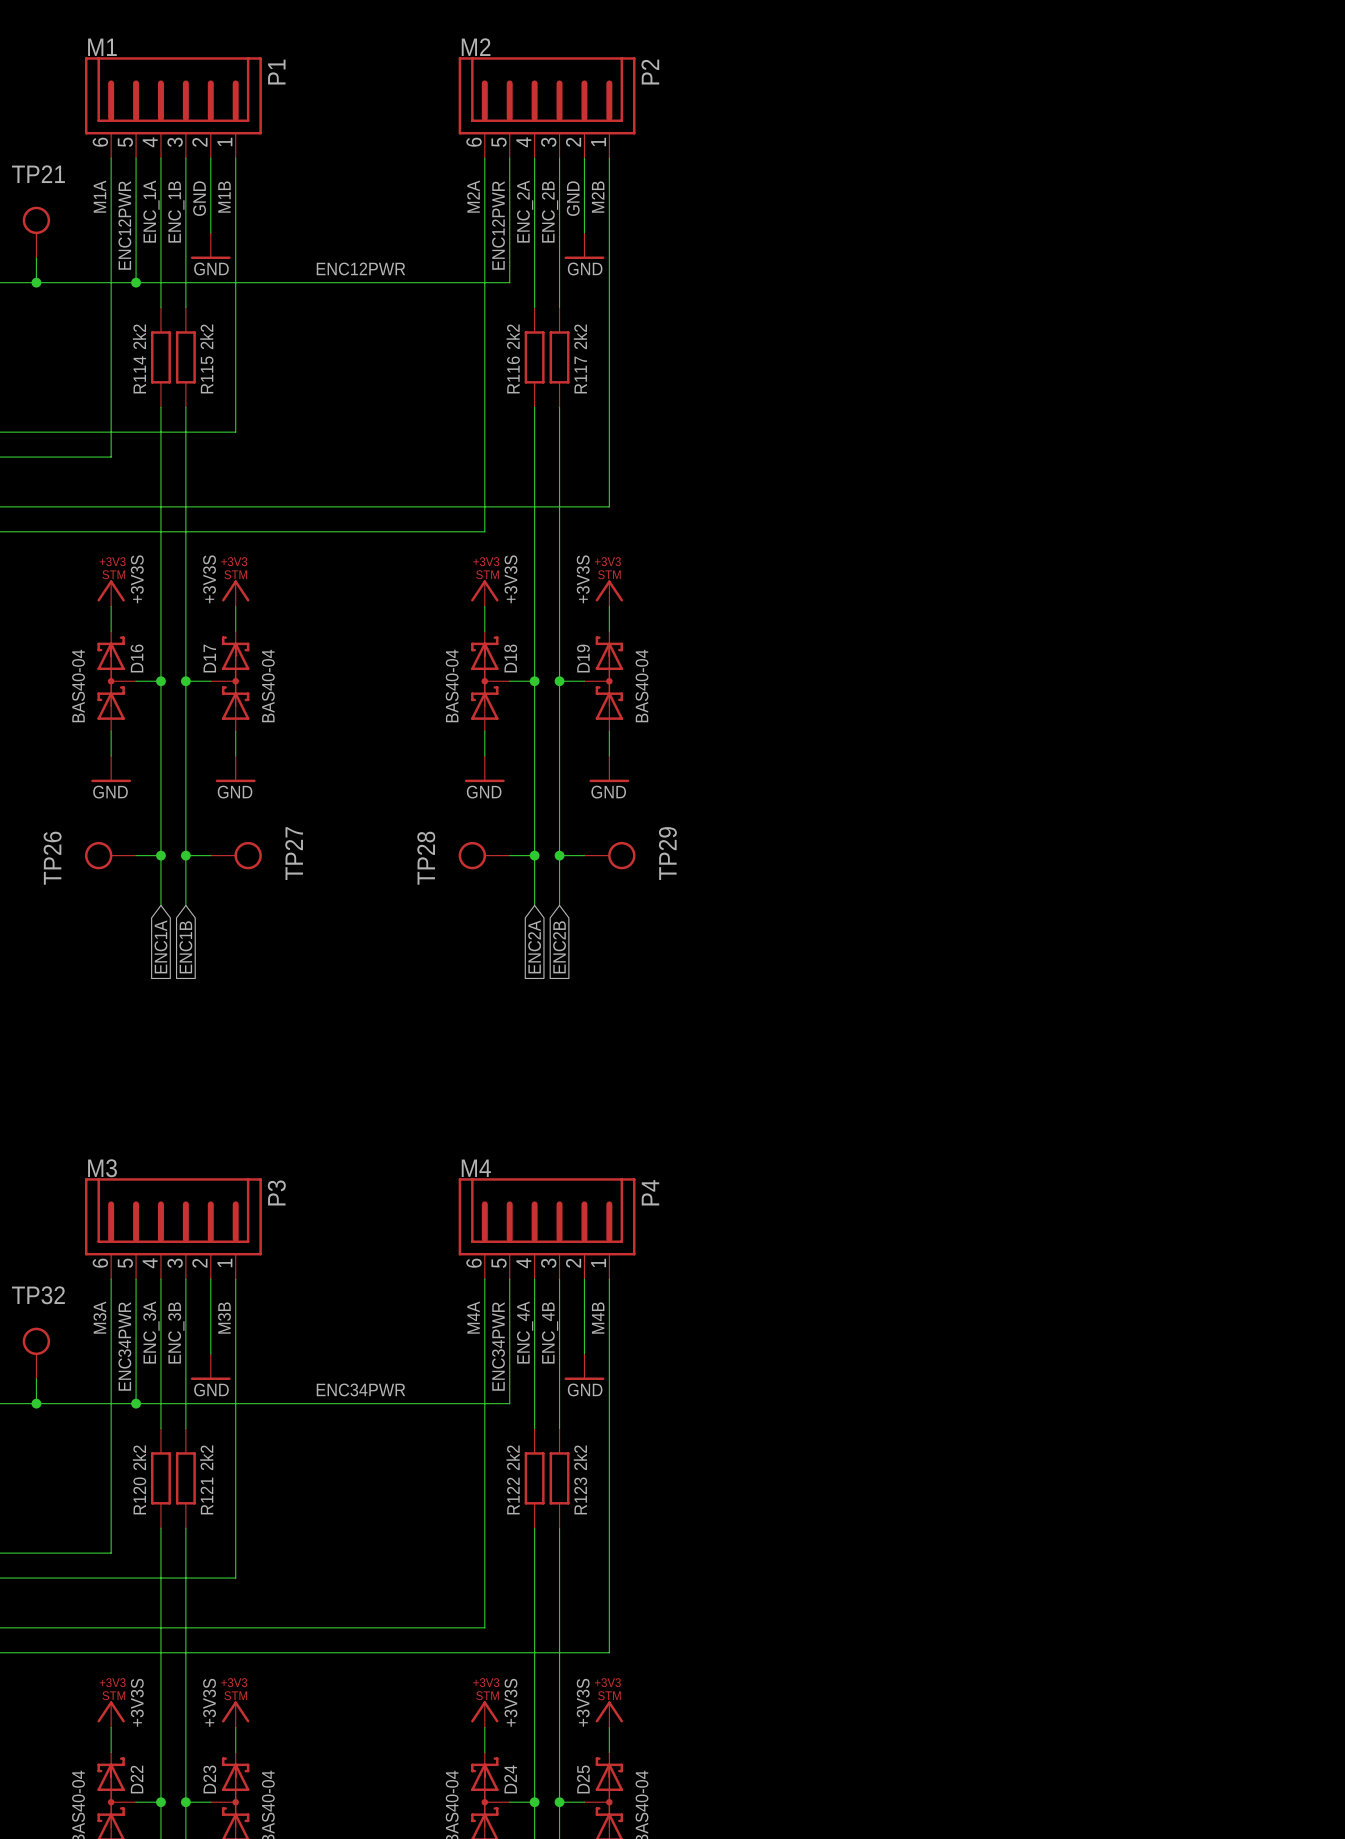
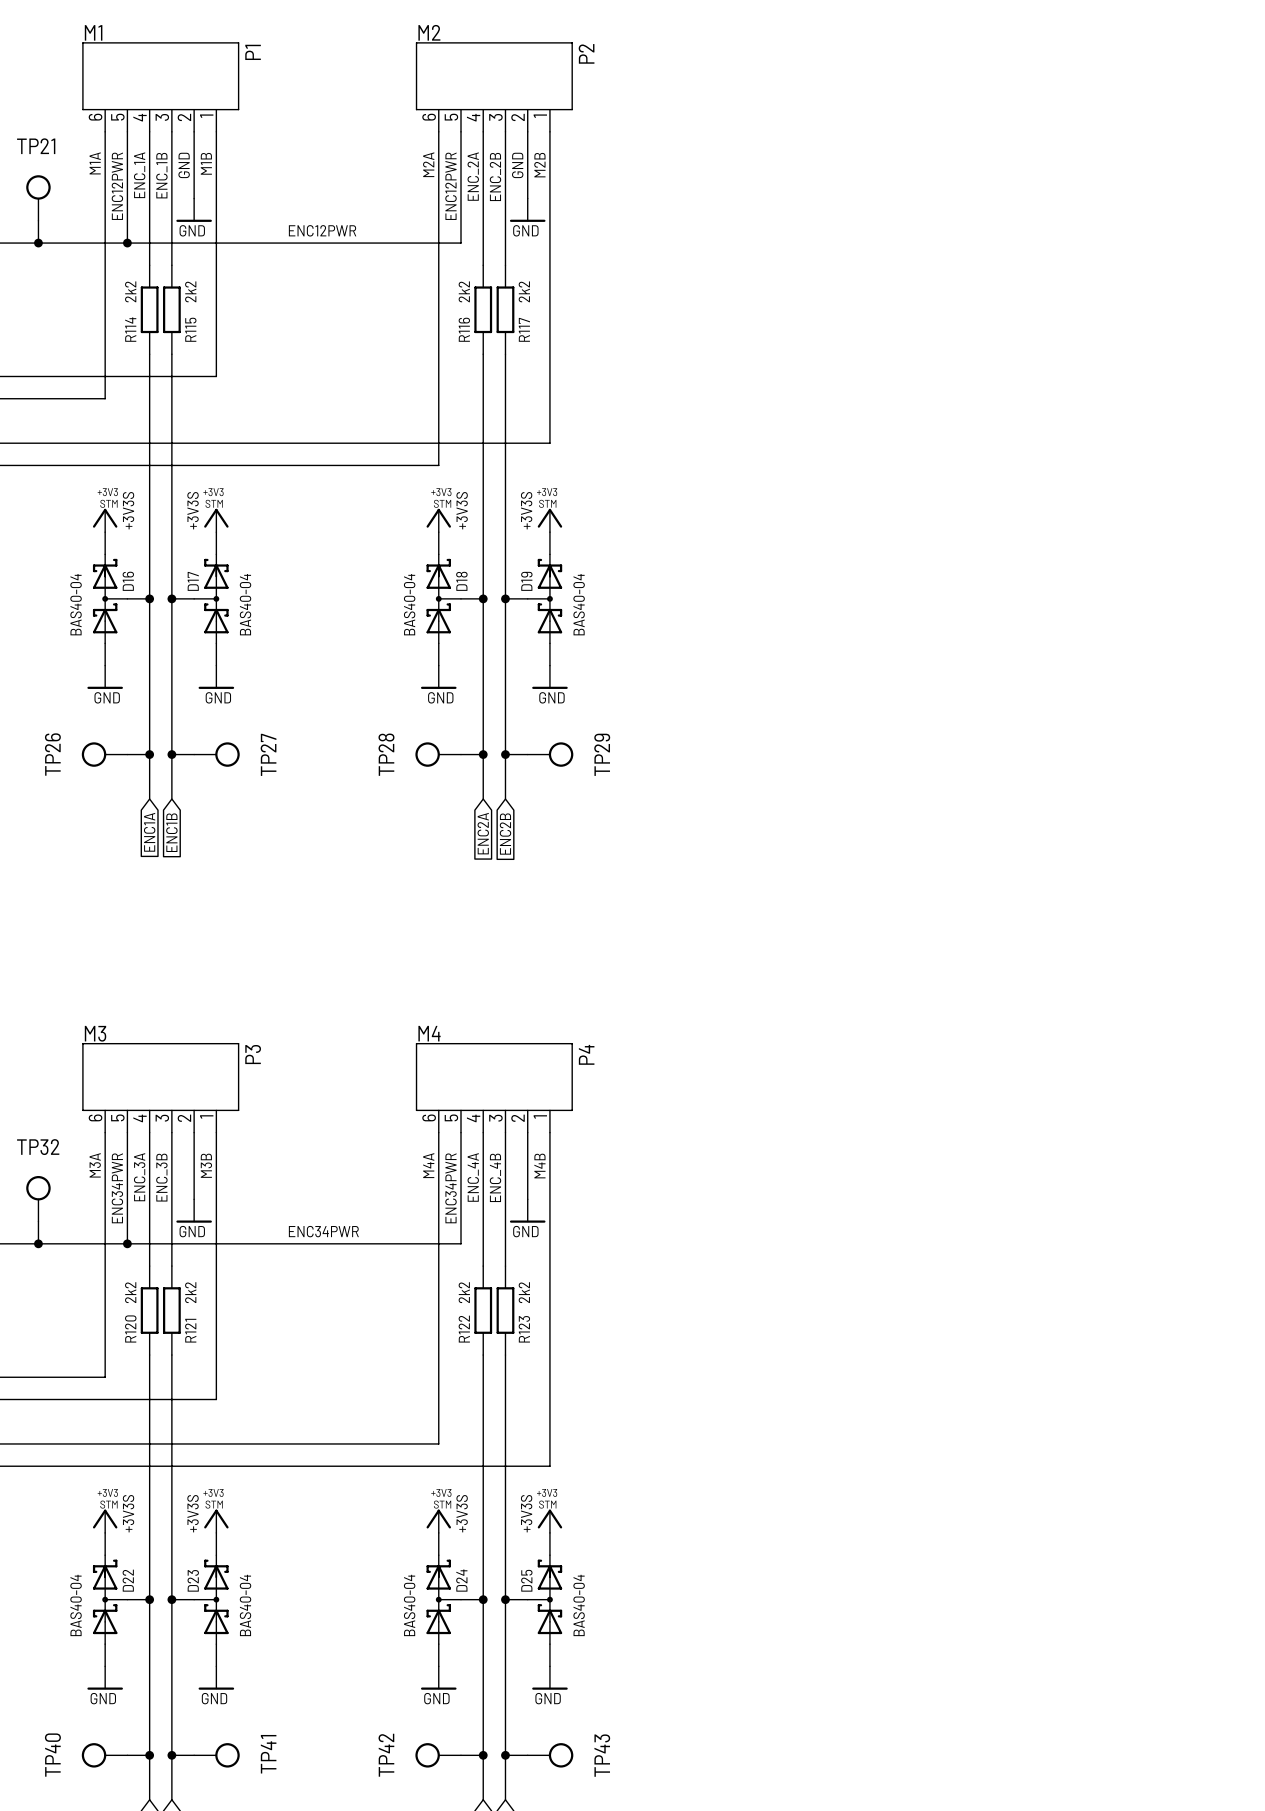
P1 symbol: [84, 57, 262, 159] -> [82, 42, 240, 132]
P2 symbol: [458, 57, 636, 159] -> [415, 42, 573, 132]
P3 symbol: [84, 1178, 262, 1280] -> [82, 1043, 240, 1133]
P4 symbol: [458, 1178, 636, 1280] -> [415, 1043, 573, 1133]

